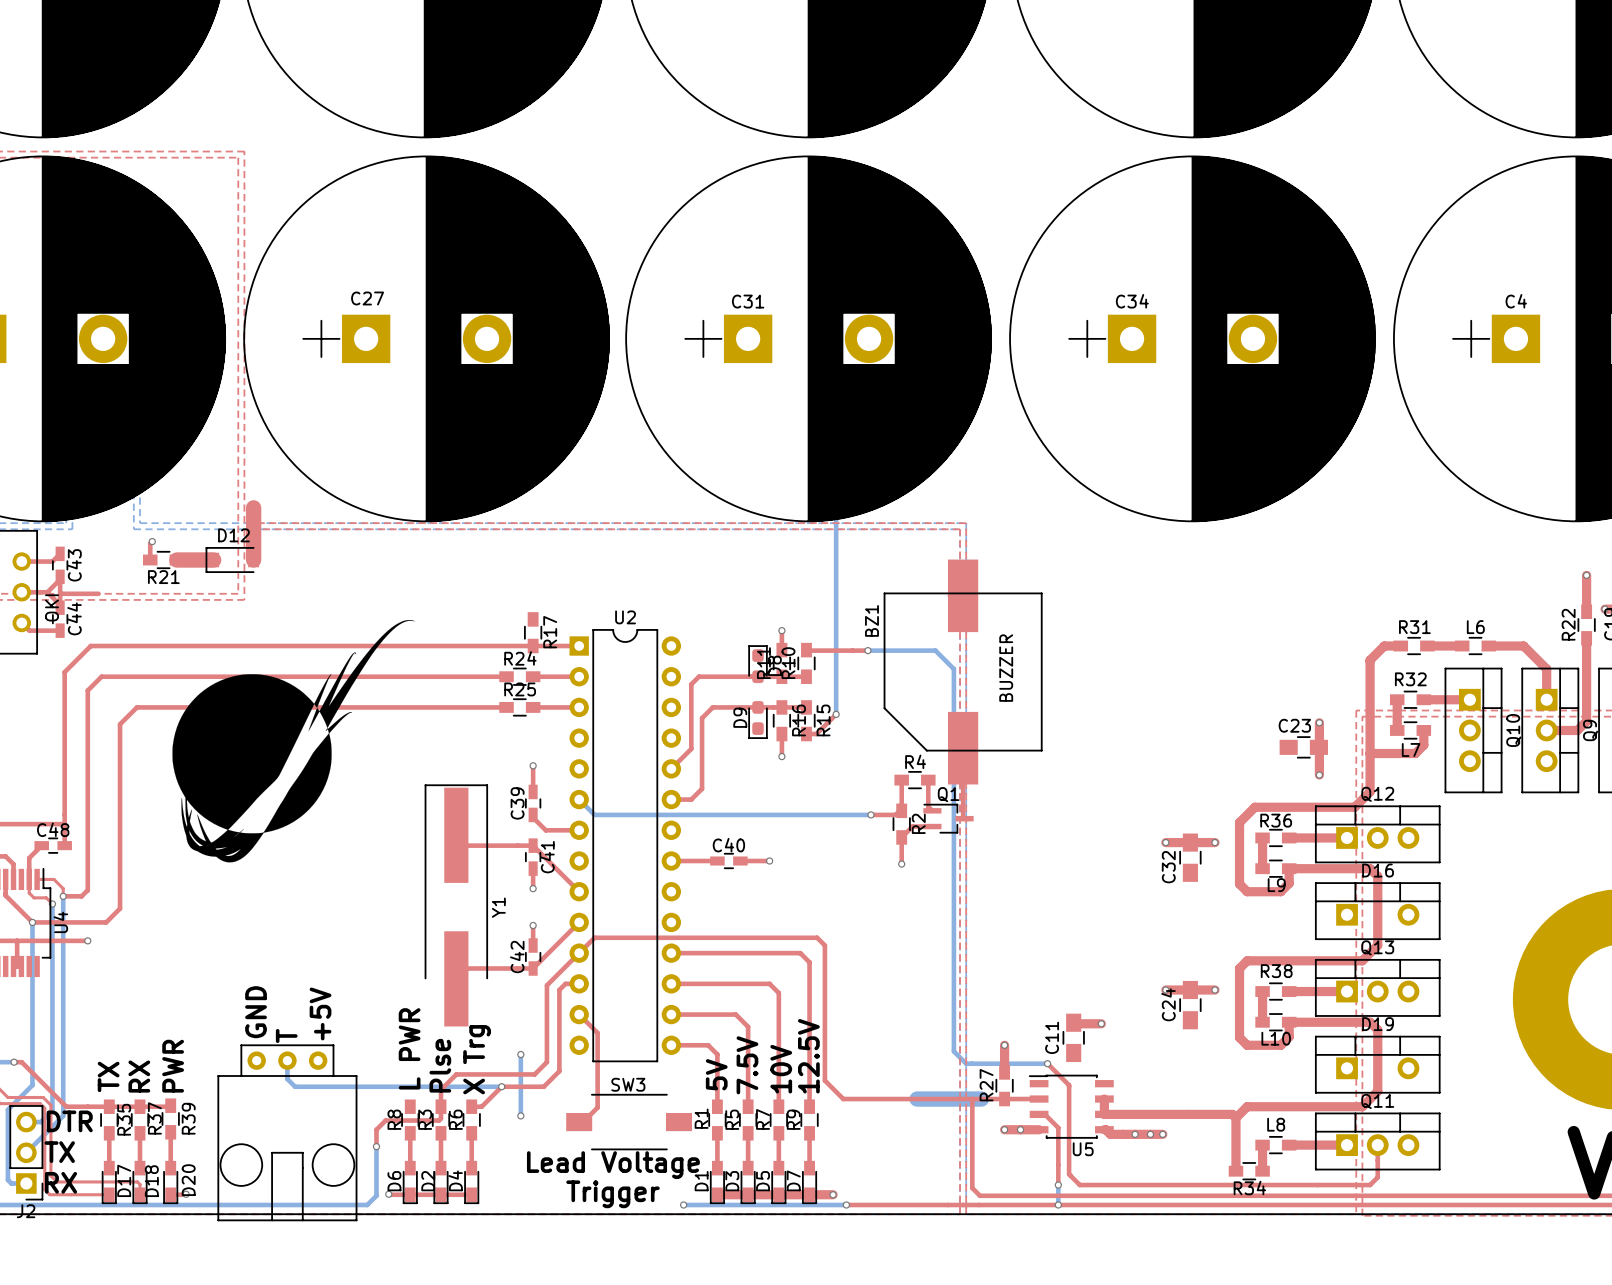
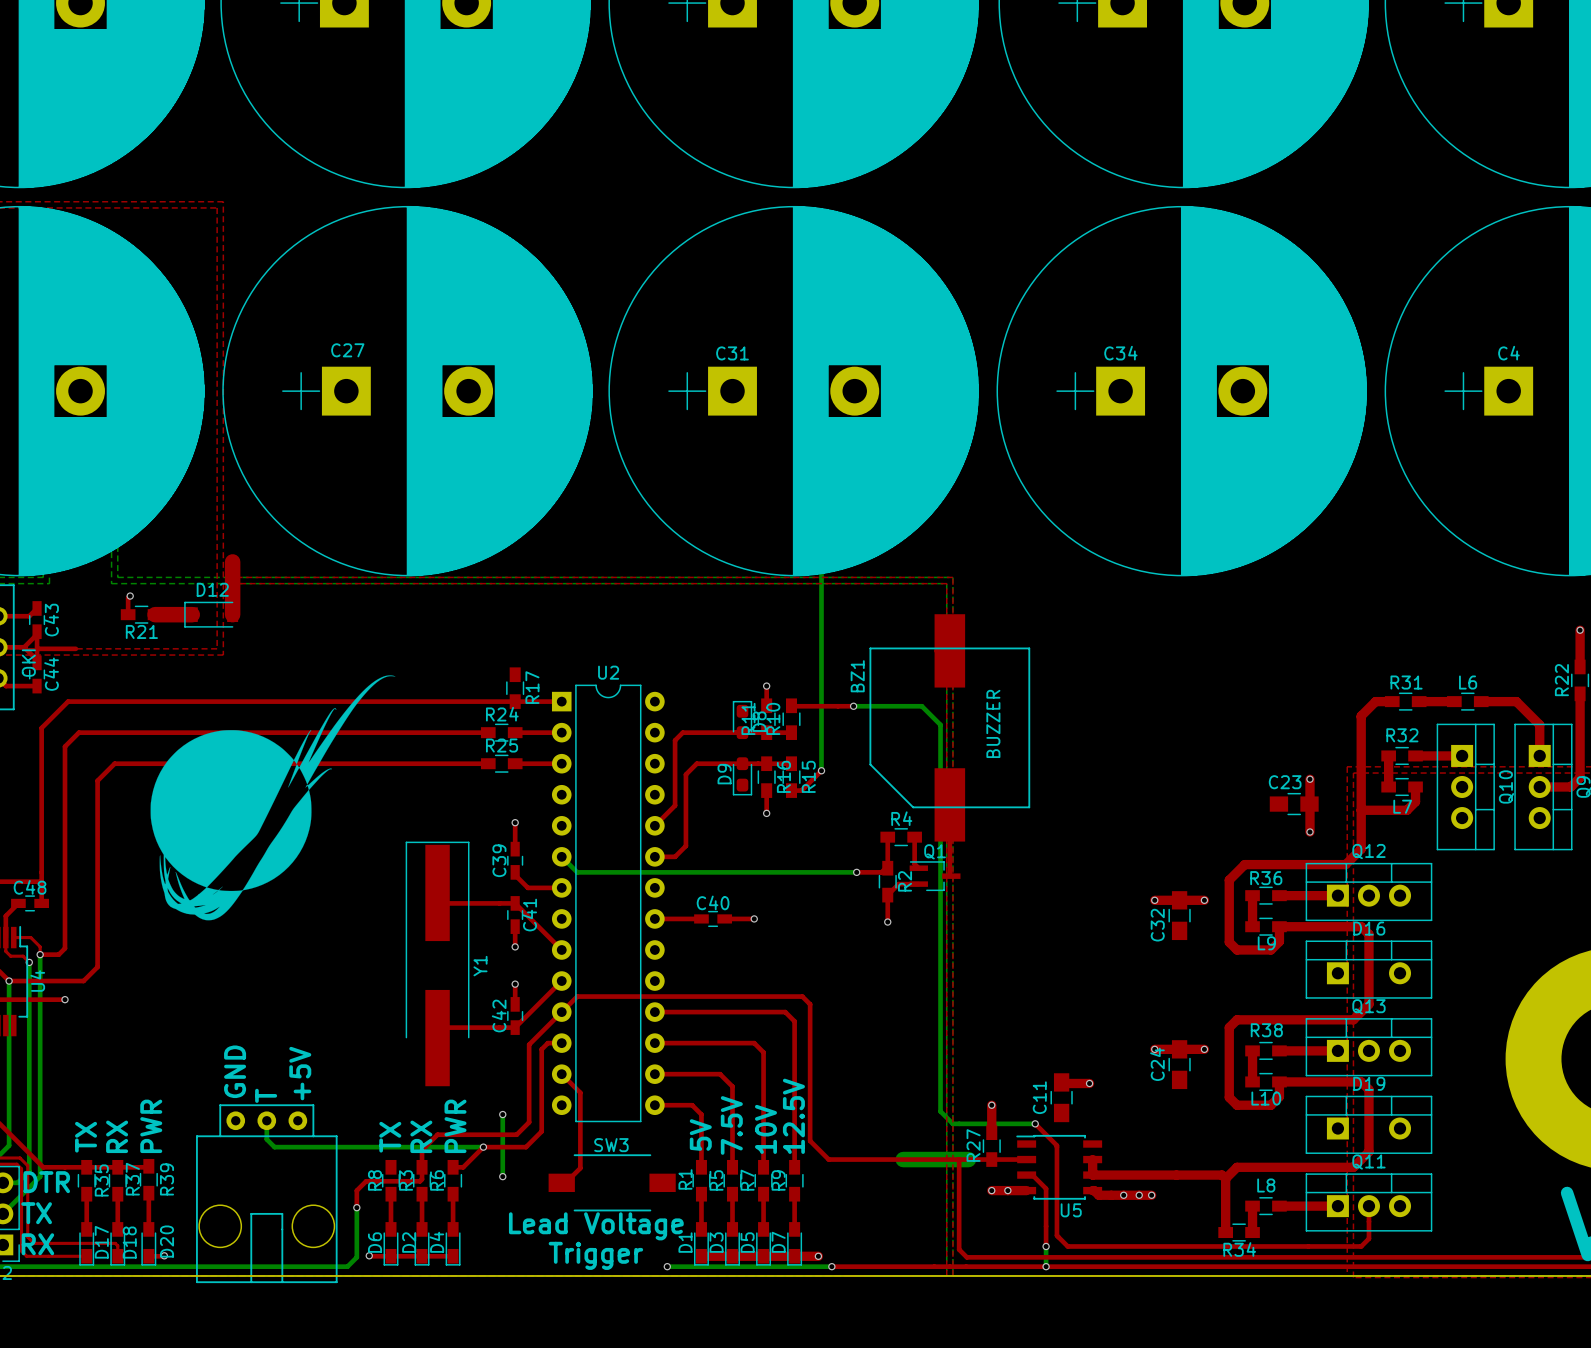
text: L PWR (409, 1048) -> TX (390, 1137)
text: X Trg (477, 1059) -> PWR (455, 1126)
text: Plse (440, 1065) -> RX (421, 1136)

